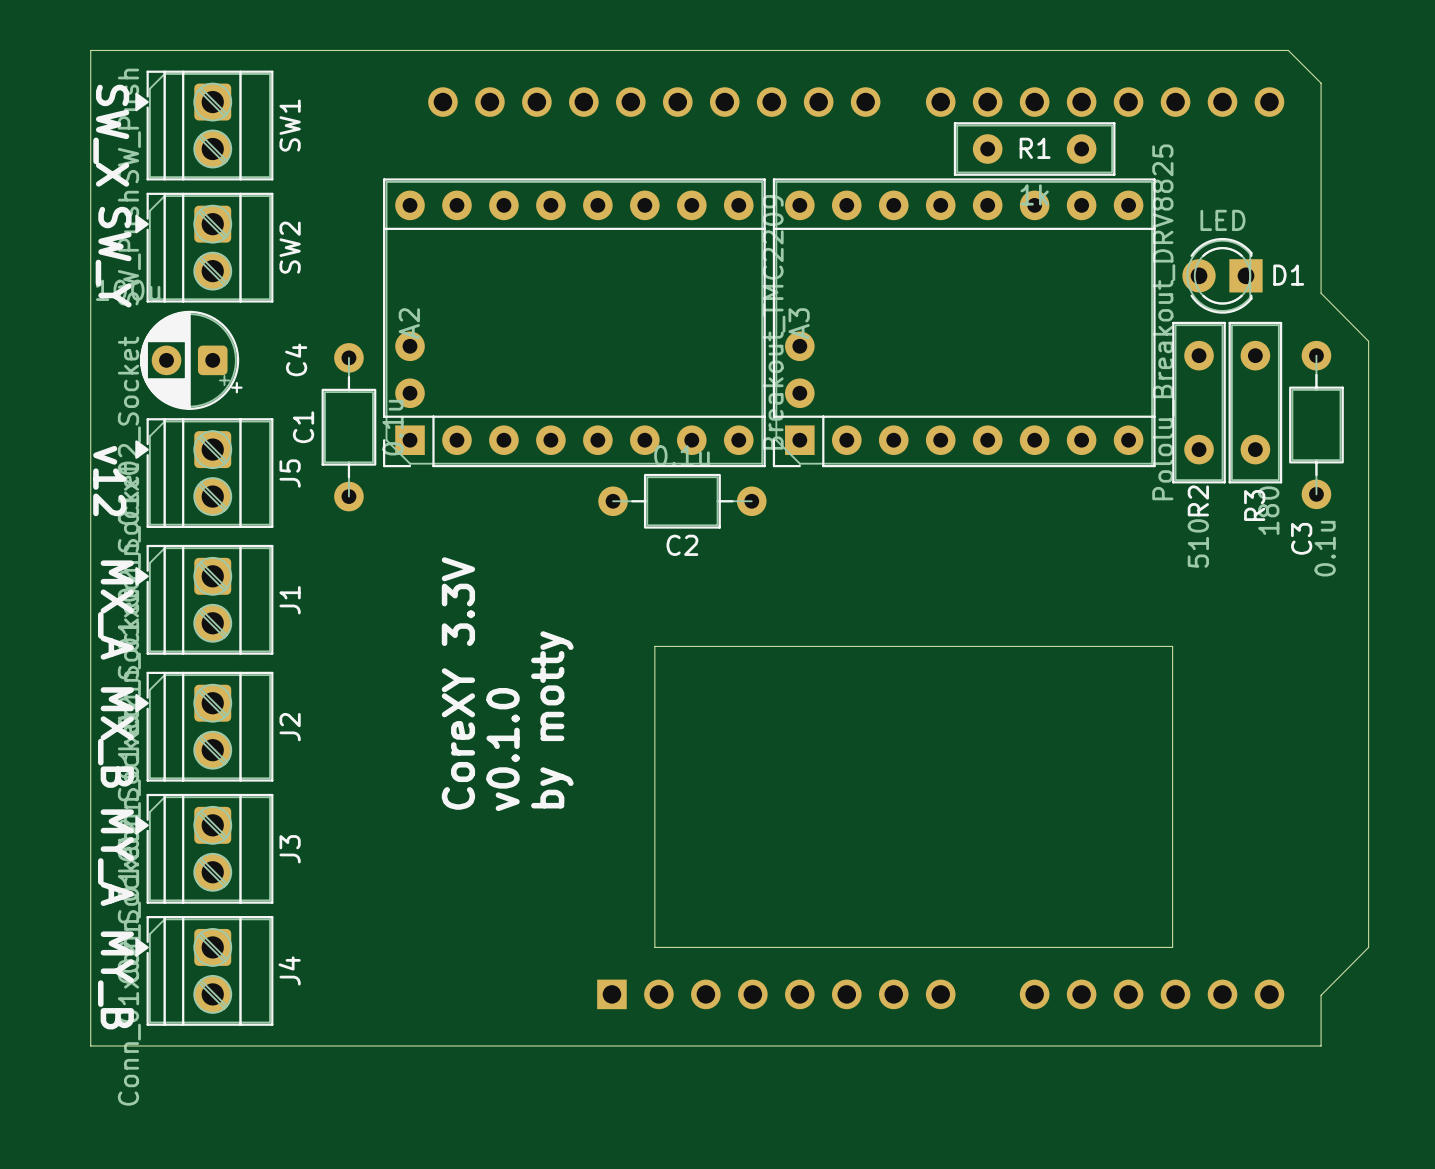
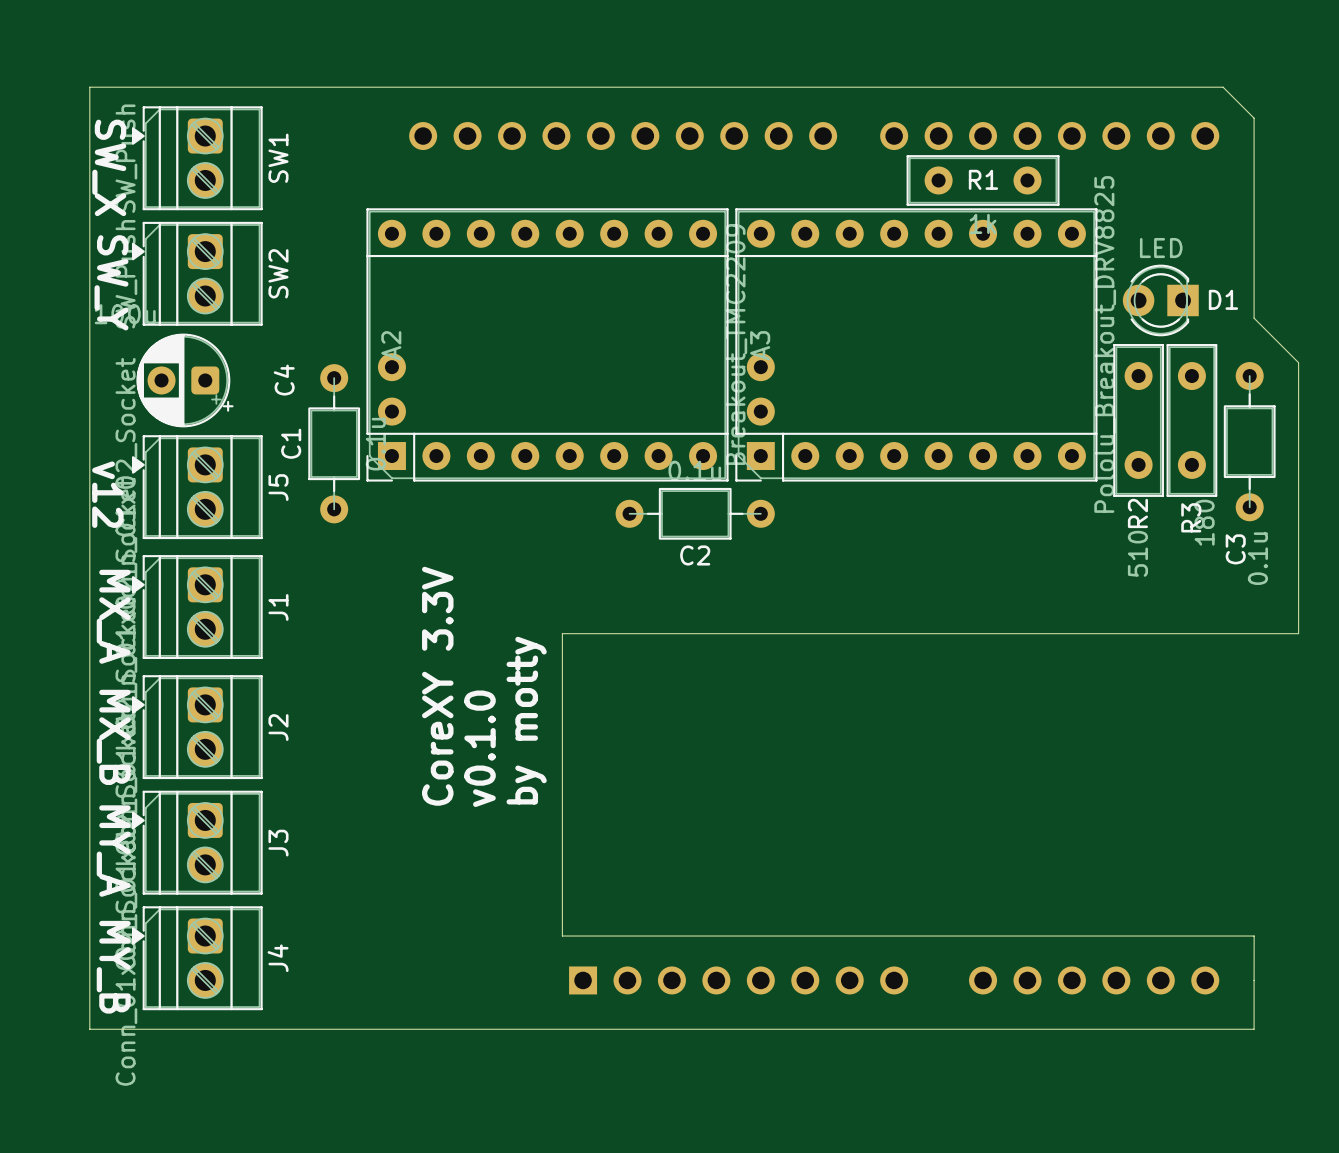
board edge: (1321, 293) (1368, 341) (1368, 947) (1321, 995) -> (1254, 316) (1298, 362) (1298, 633) (562, 633) (562, 936) (623, 936)
C2 position: (682, 501) -> (695, 513)
board edge: (654, 947) (654, 646) (1172, 646) (1172, 947) -> (1254, 981) (1254, 936) (1113, 936)

